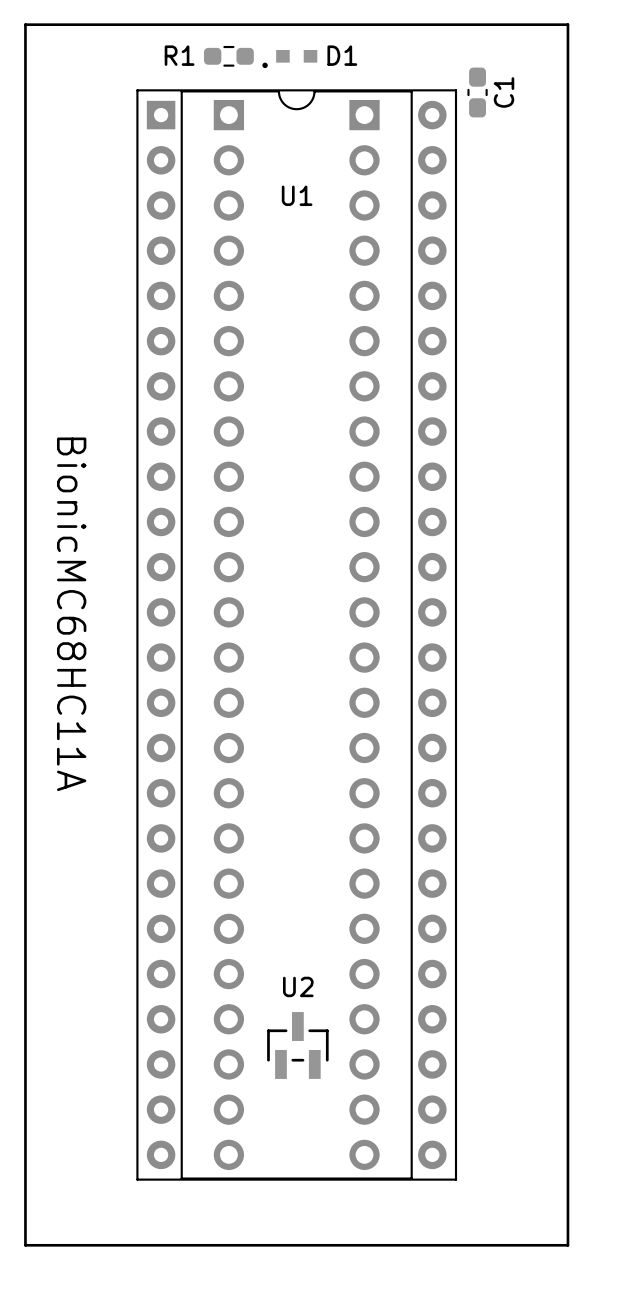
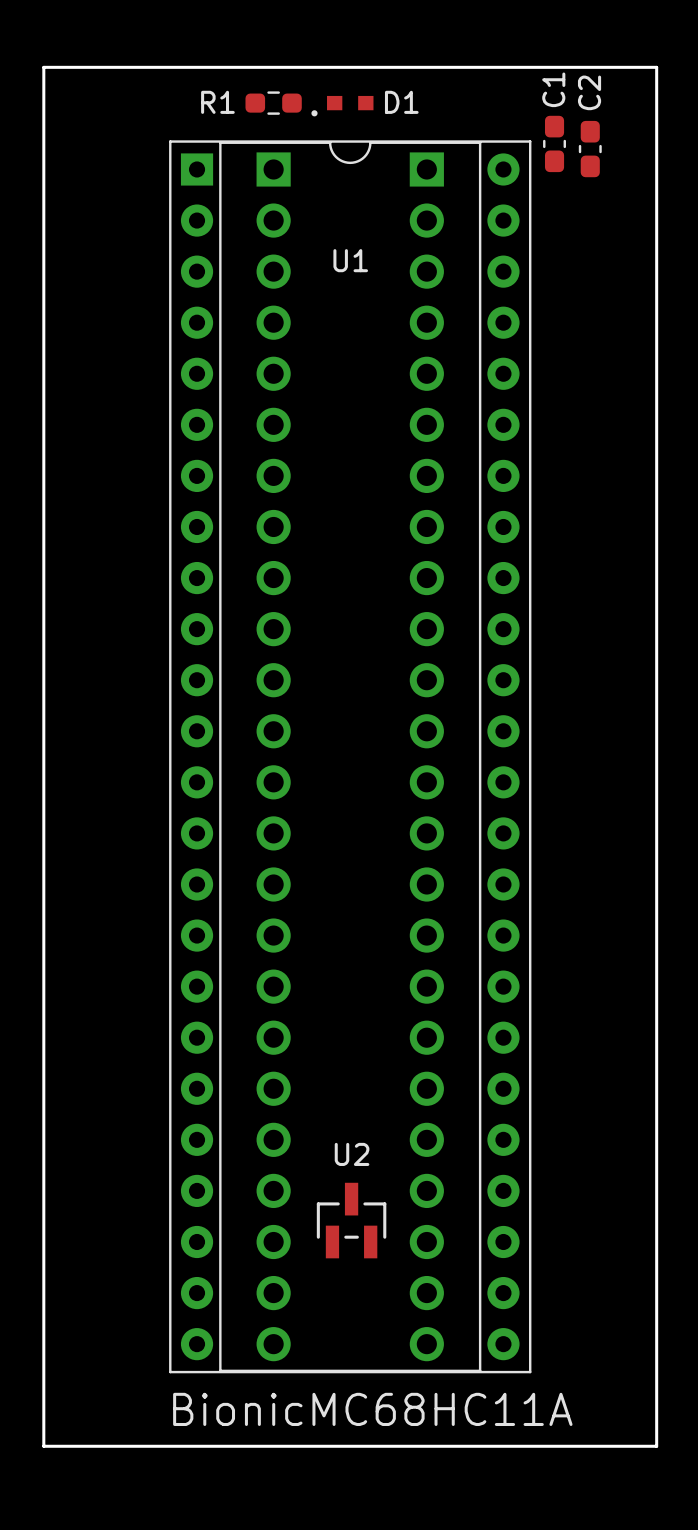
C1 name position: C1 (504, 92) -> C1 (553, 89)
C2: none -> (590, 149)
text: BionicMC68HC11A (71, 614) -> none
text: none -> BionicMC68HC11A (372, 1409)

